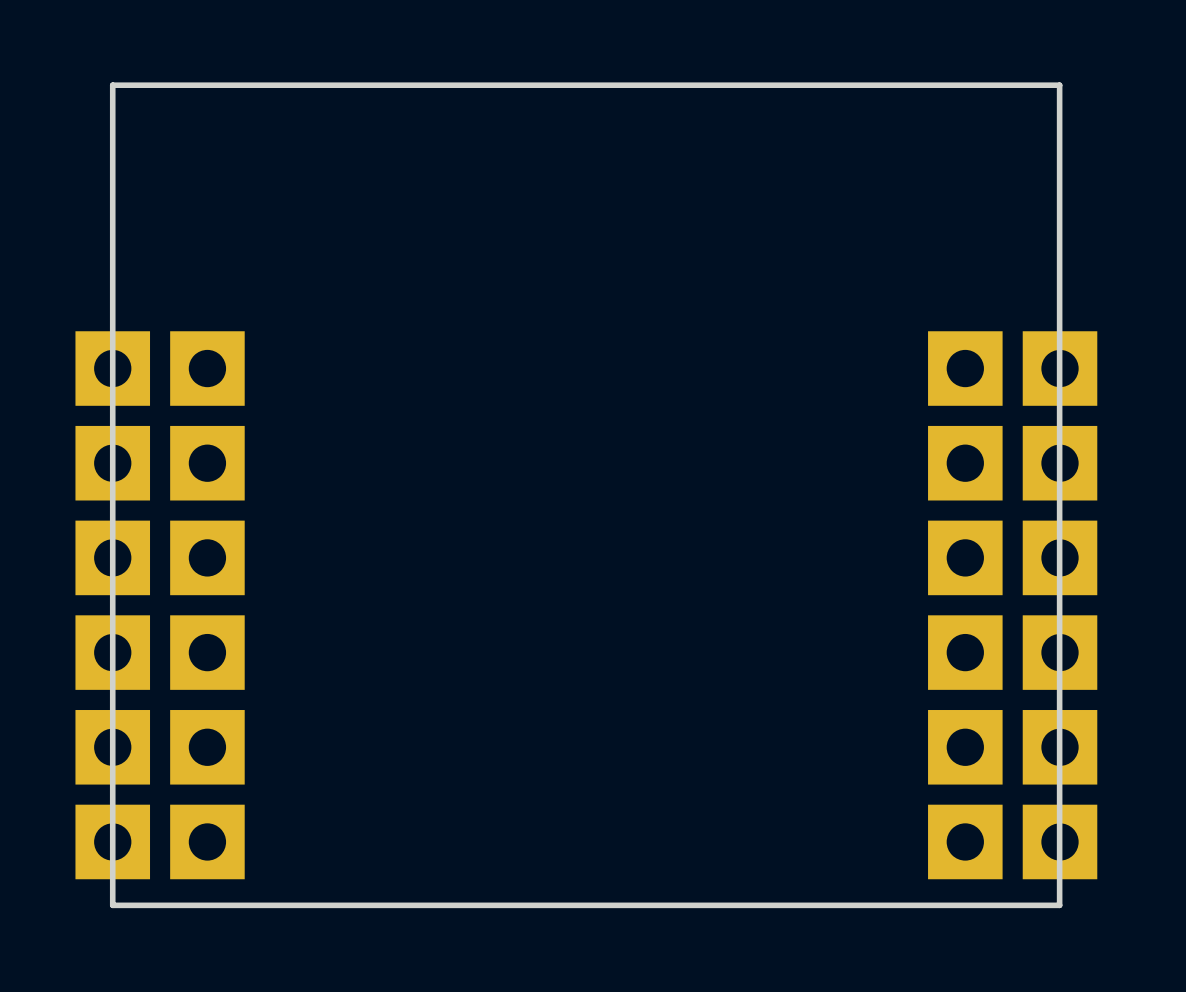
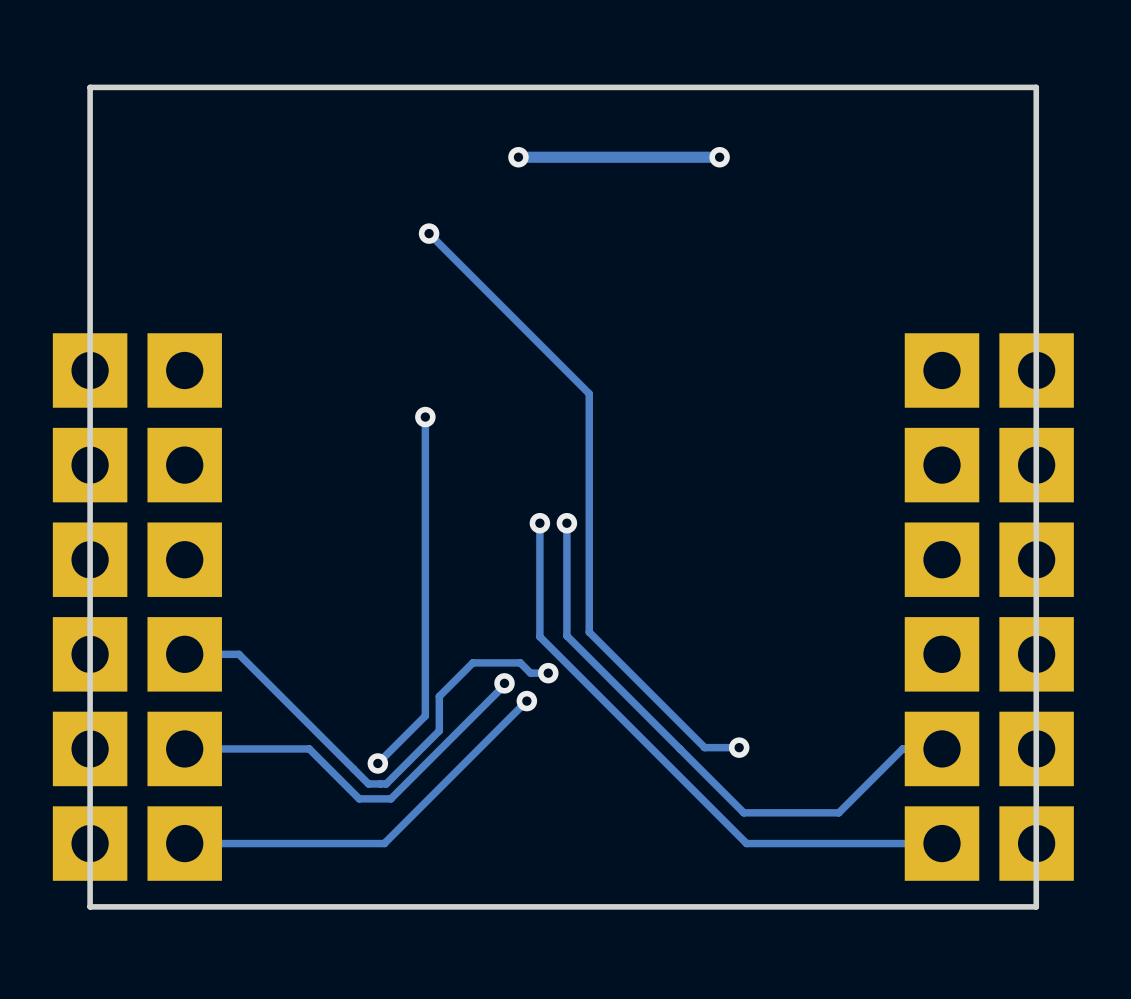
via: none -> (518, 157)
track: none -> (719, 157) (518, 157)
via: none -> (719, 157)
track: none -> (429, 233) (589, 393) (589, 632) (704, 747) (739, 747)
via: none -> (429, 233)
track: none -> (425, 417) (425, 715) (377, 763)
via: none -> (425, 417)
track: none -> (539, 523) (539, 636) (746, 843) (942, 843)
via: none -> (539, 523)
track: none -> (566, 523) (566, 635) (743, 812) (838, 812) (902, 748) (942, 748)
via: none -> (566, 523)
track: none -> (184, 654) (238, 654) (368, 783) (386, 783) (439, 730) (439, 696) (472, 662) (520, 662) (530, 673) (548, 673)
via: none -> (548, 673)
track: none -> (504, 683) (390, 798) (359, 798) (309, 748) (184, 748)
via: none -> (504, 683)
track: none -> (526, 701) (384, 843) (184, 843)
via: none -> (526, 701)
via: none -> (739, 747)
via: none -> (377, 763)

